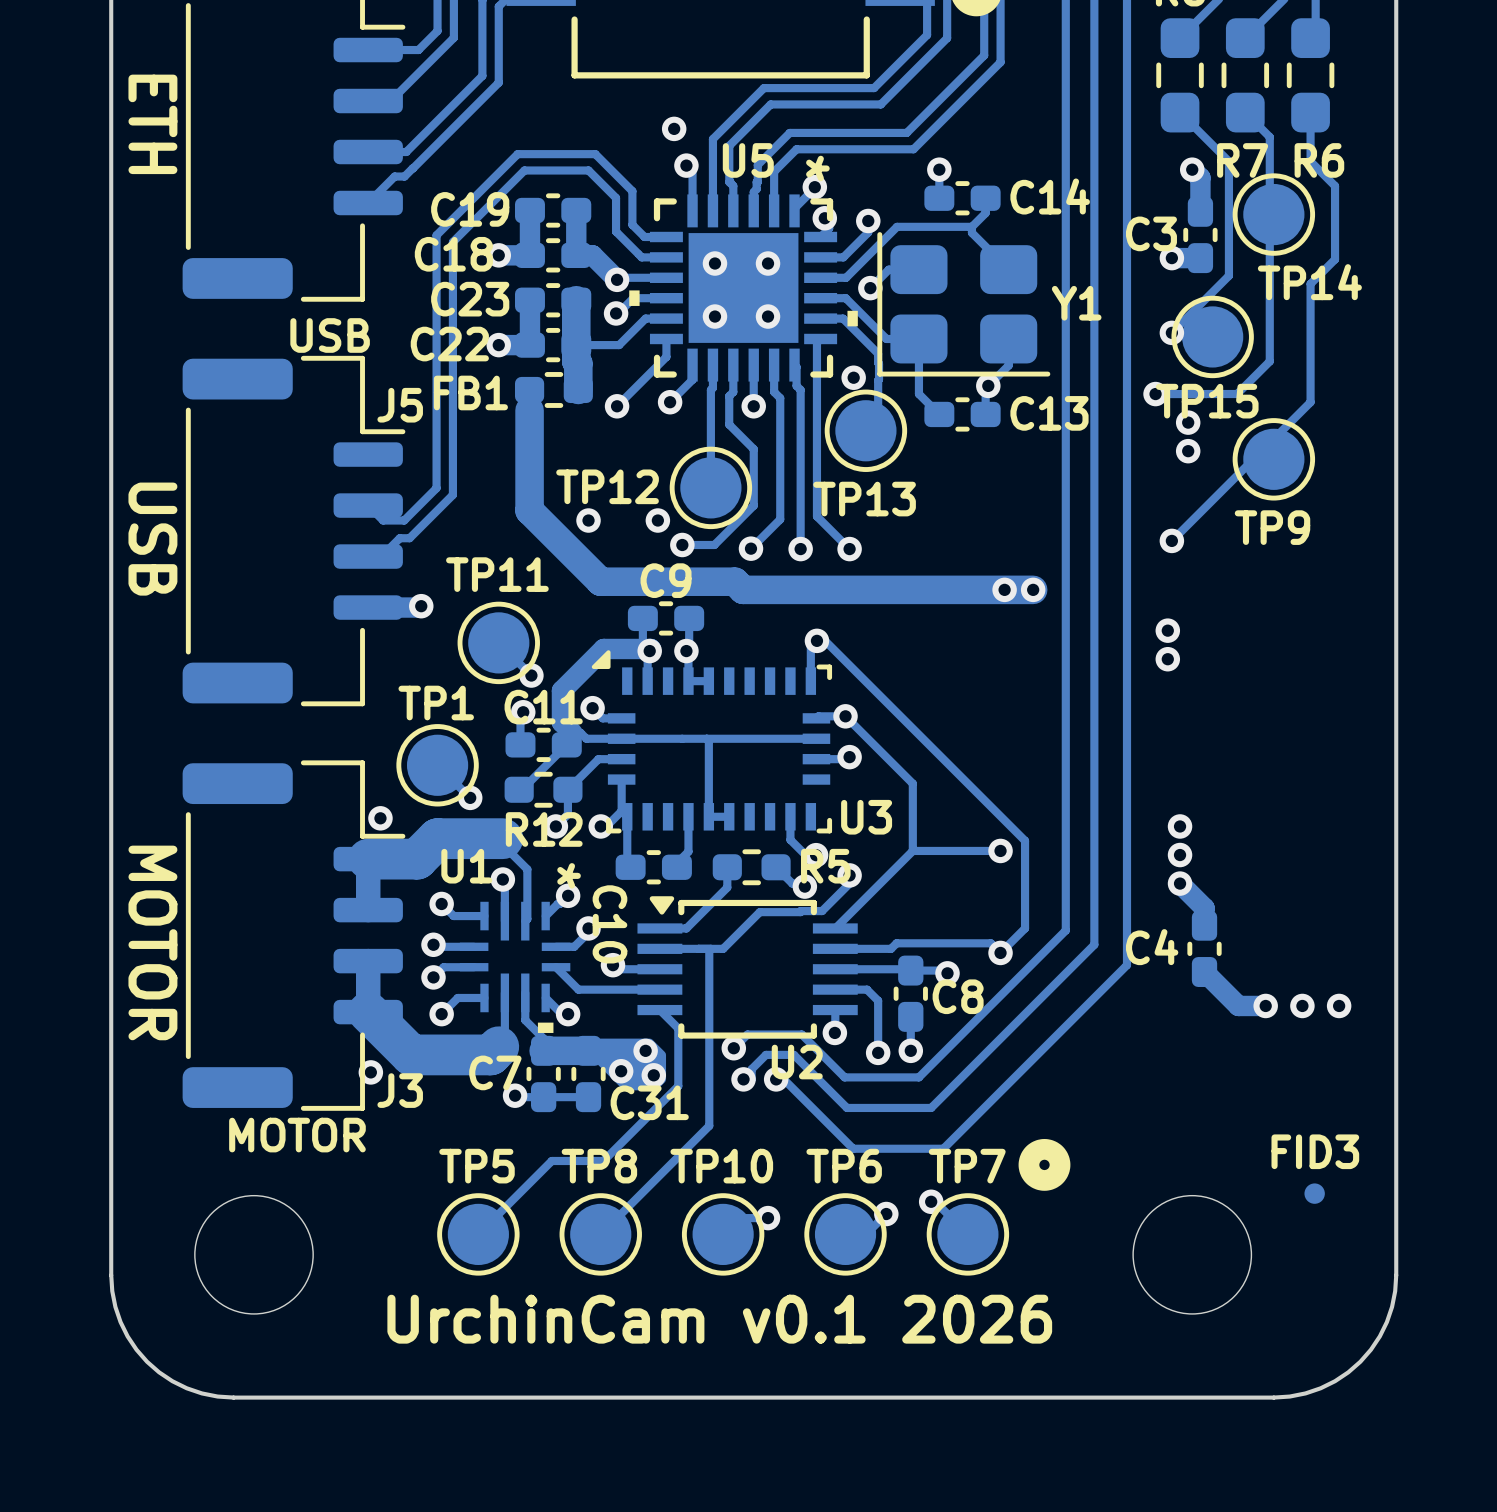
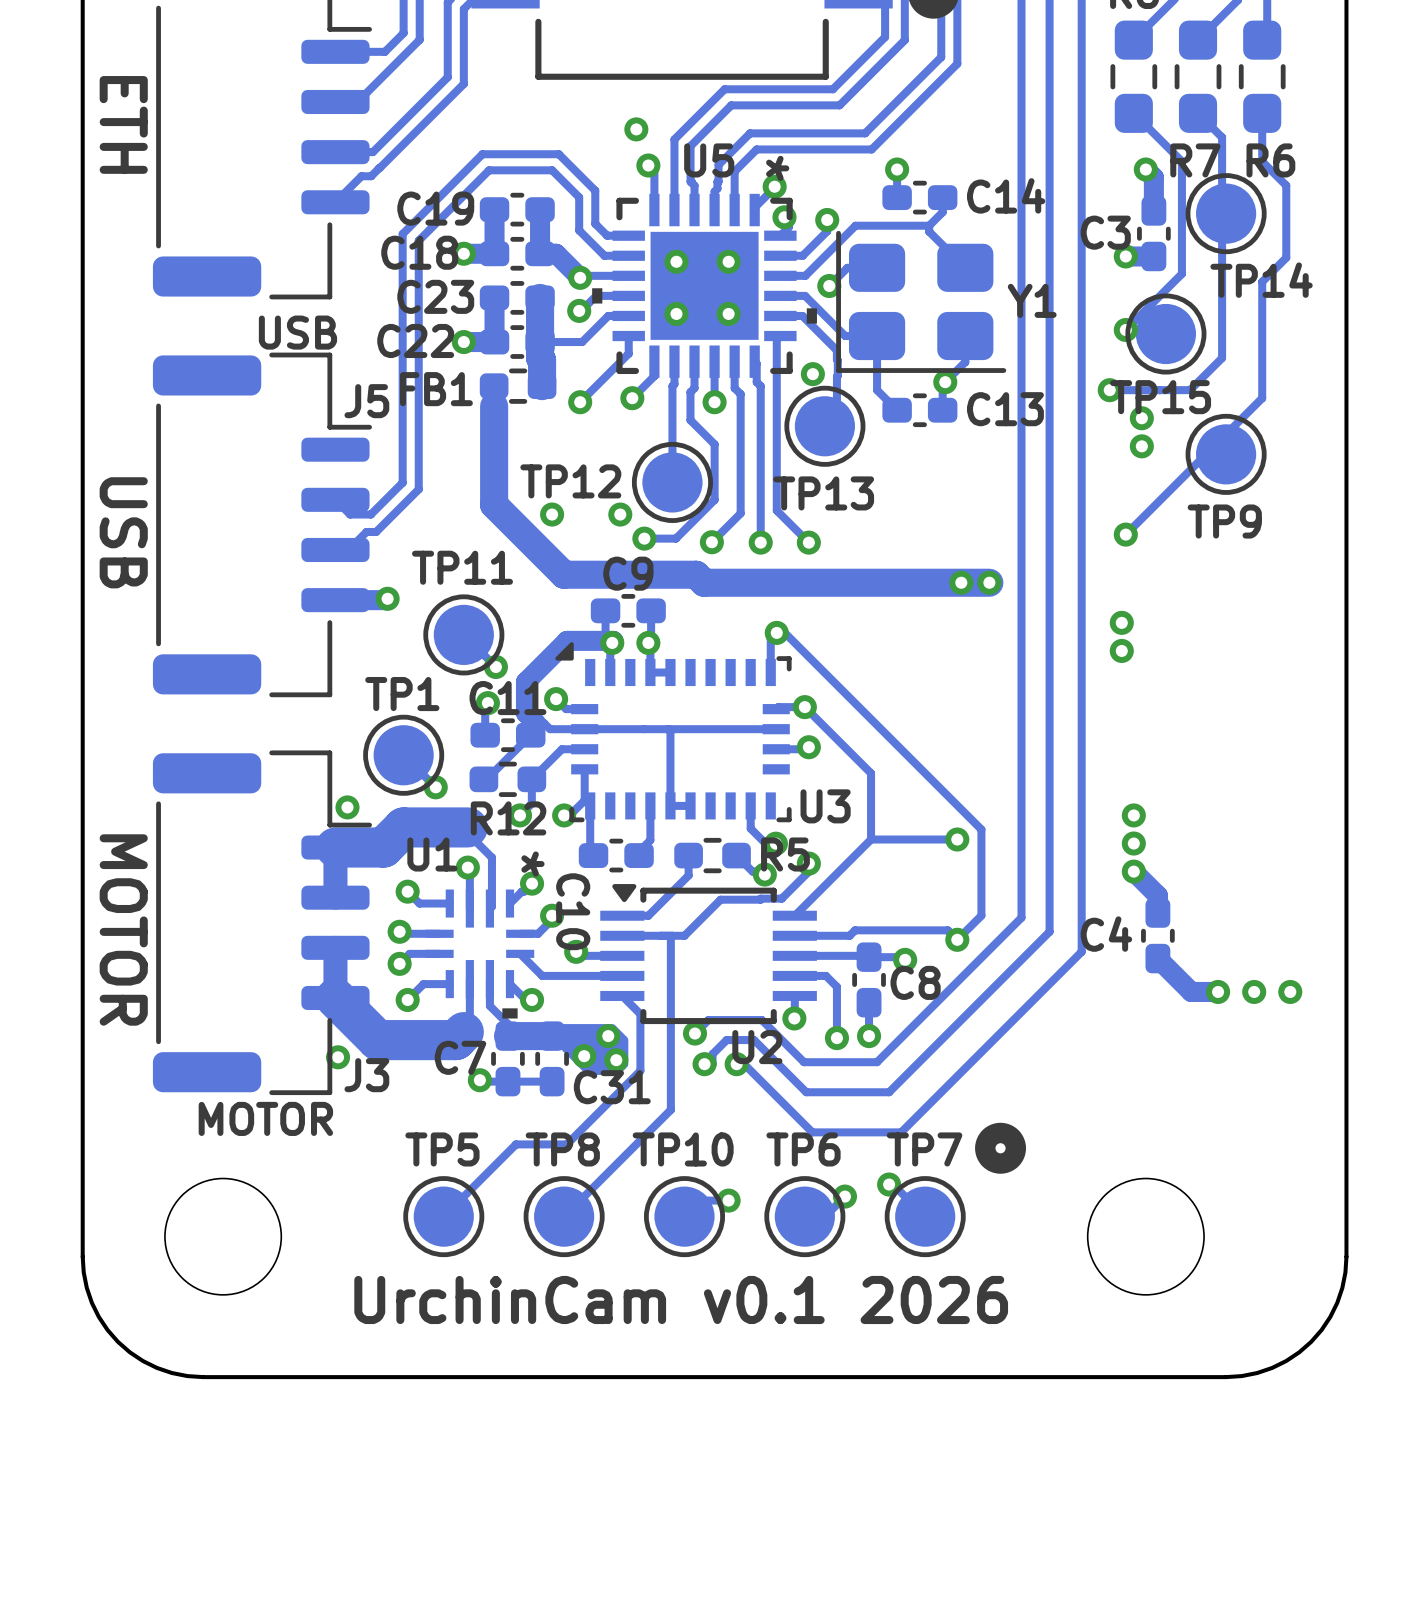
FID3: (1314, 1193) -> none

